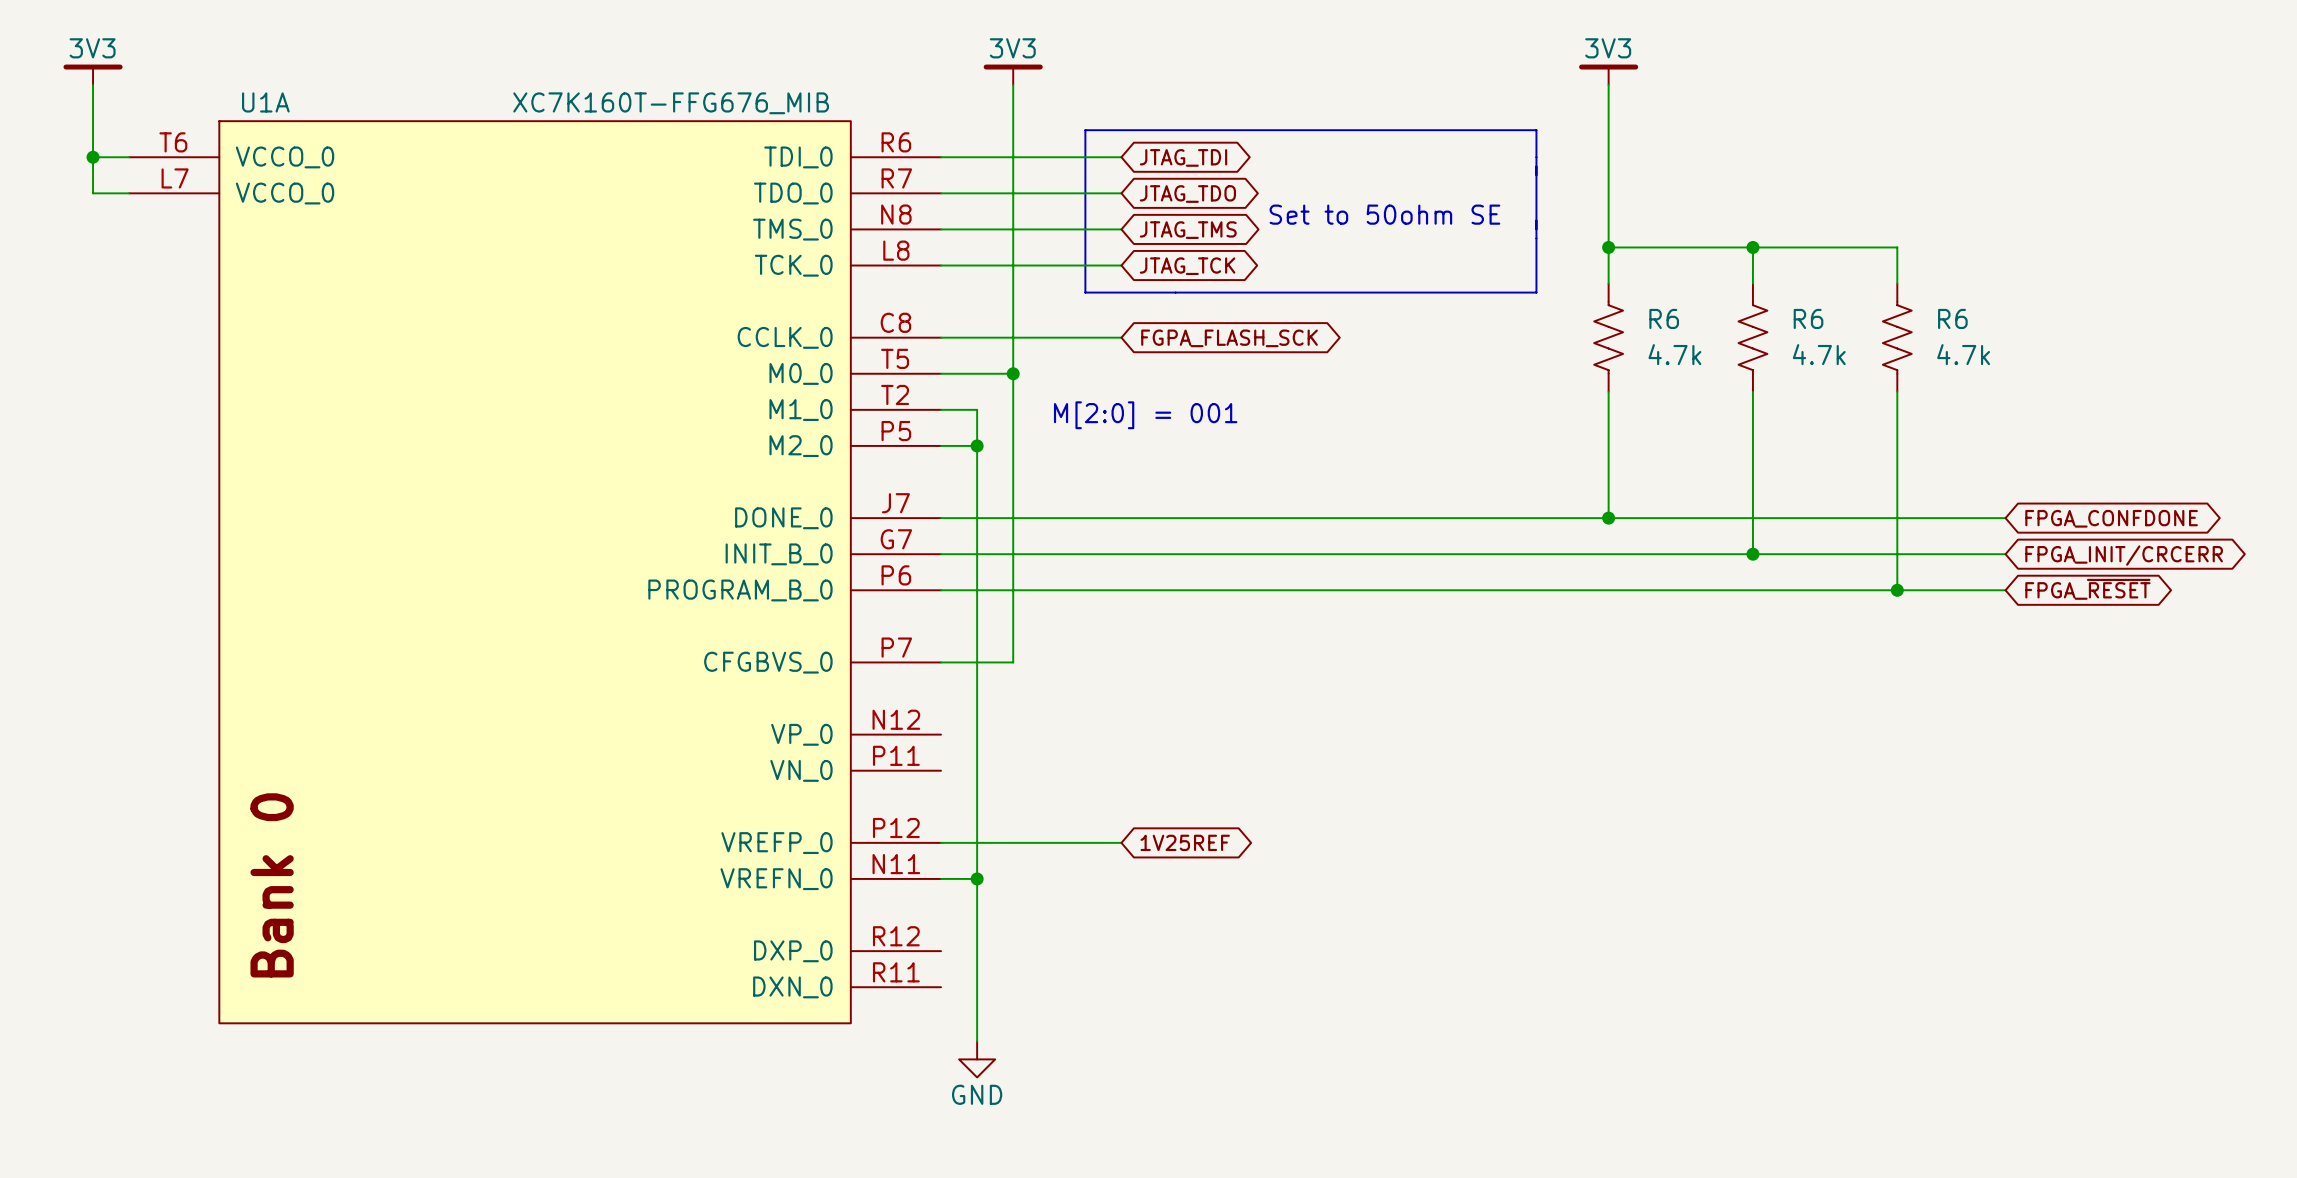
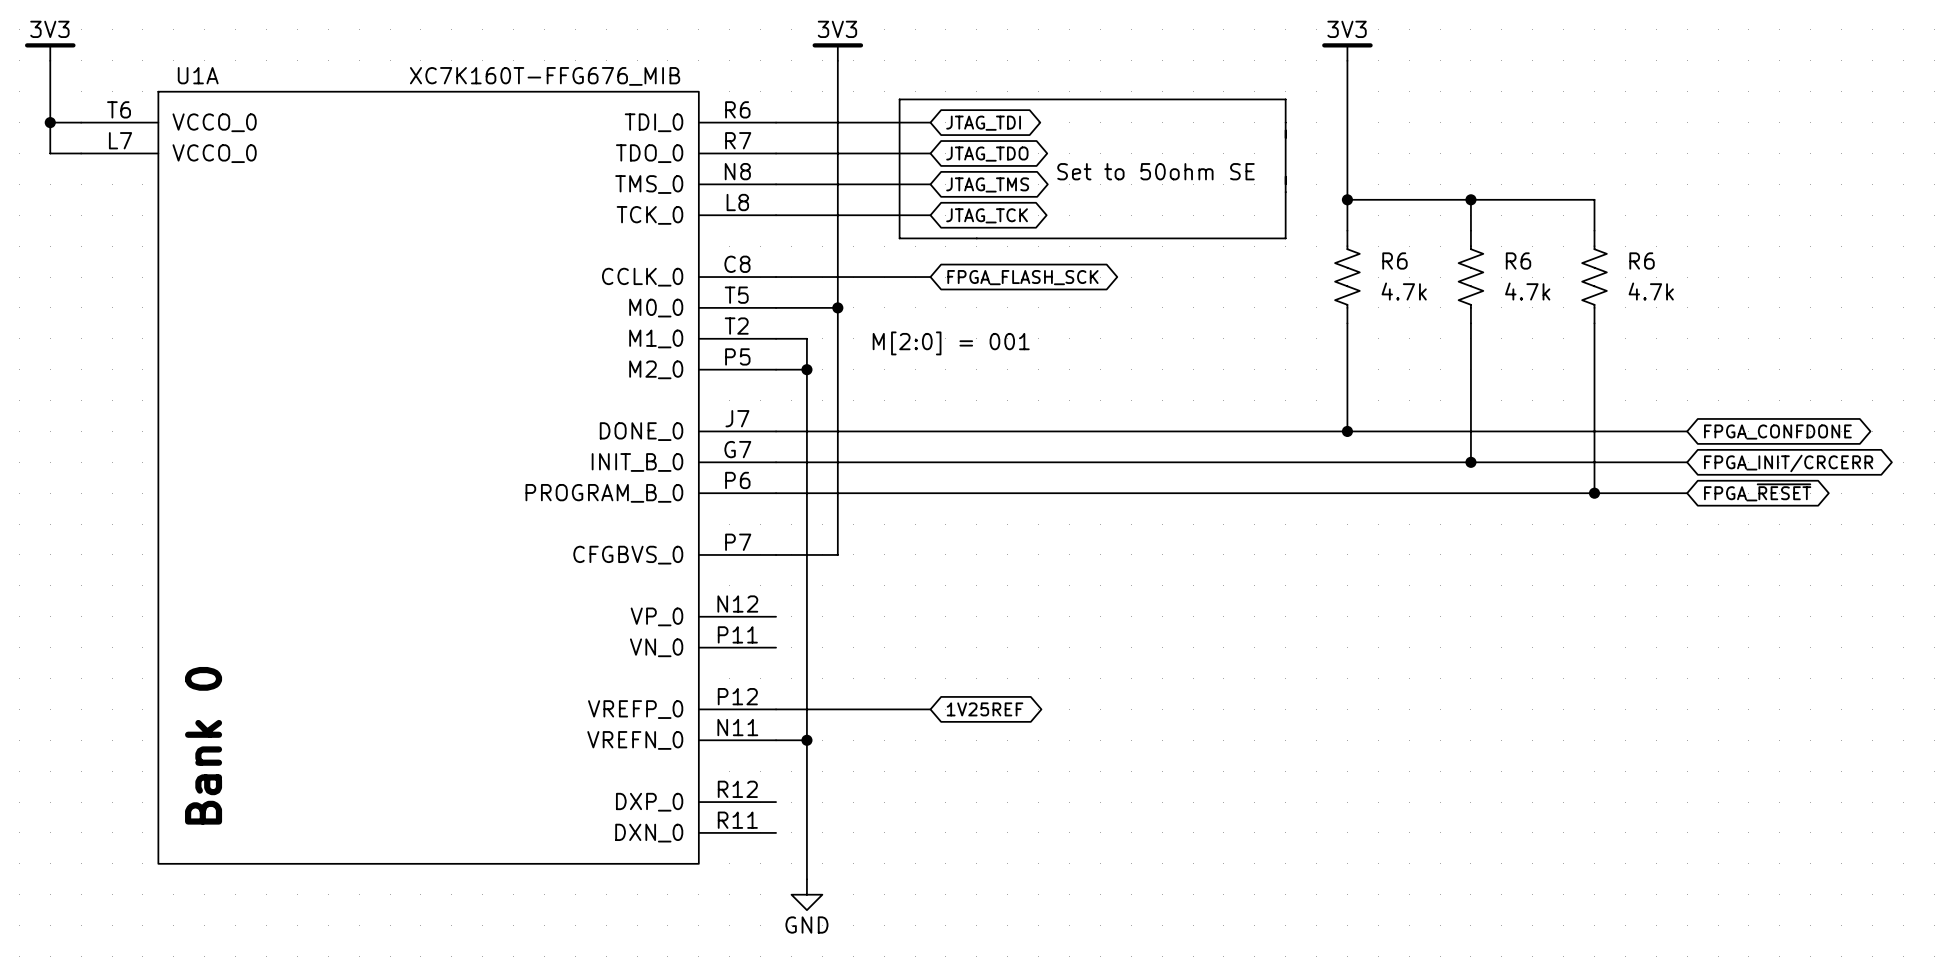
global label: FGPA_FLASH_SCK (1229, 338) -> FPGA_FLASH_SCK (1022, 277)

